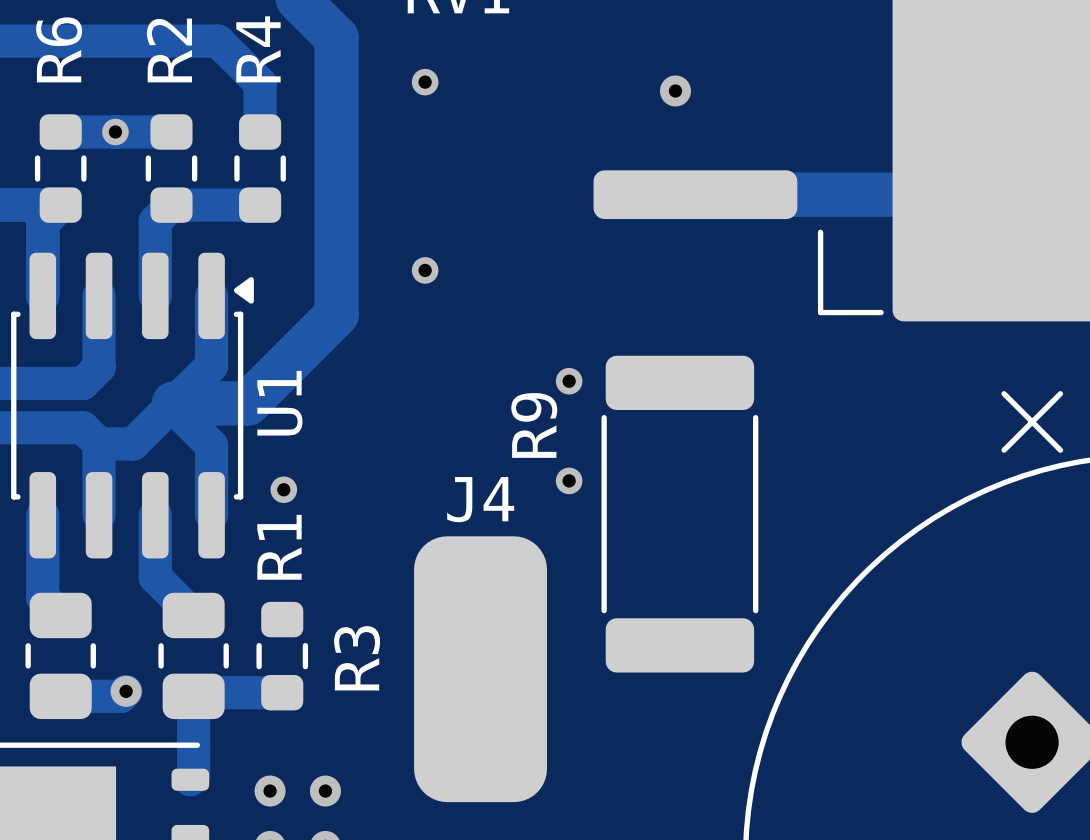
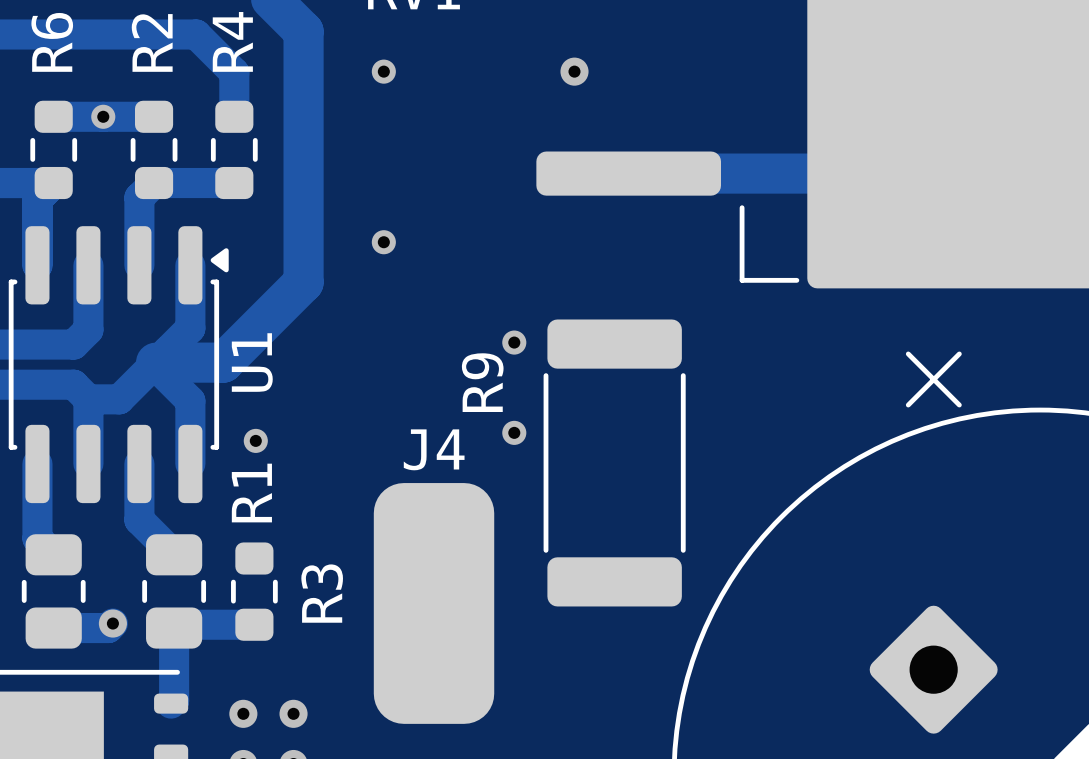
via position: (675, 90) -> (574, 71)

